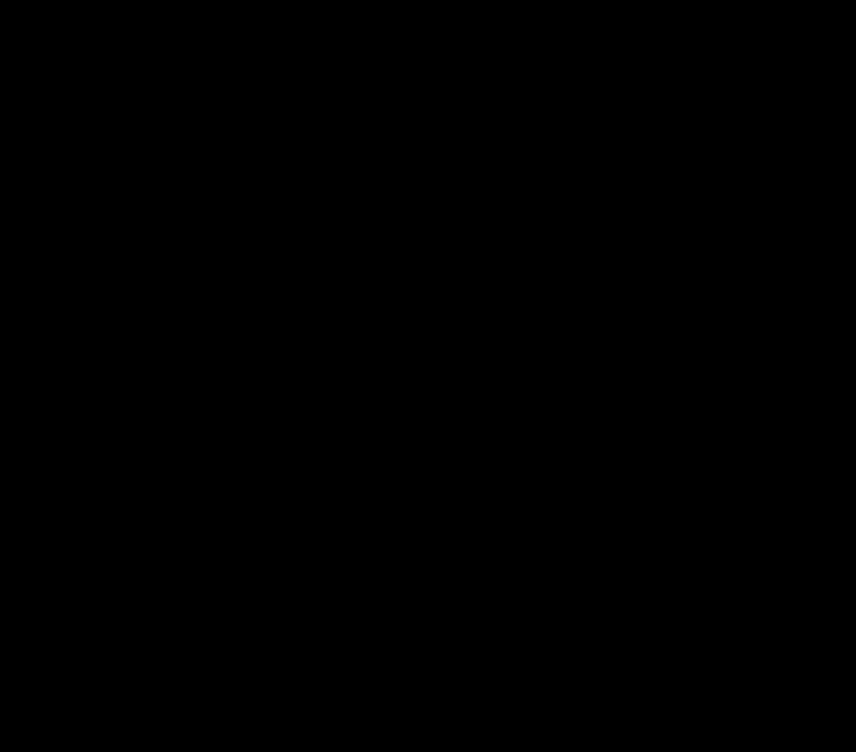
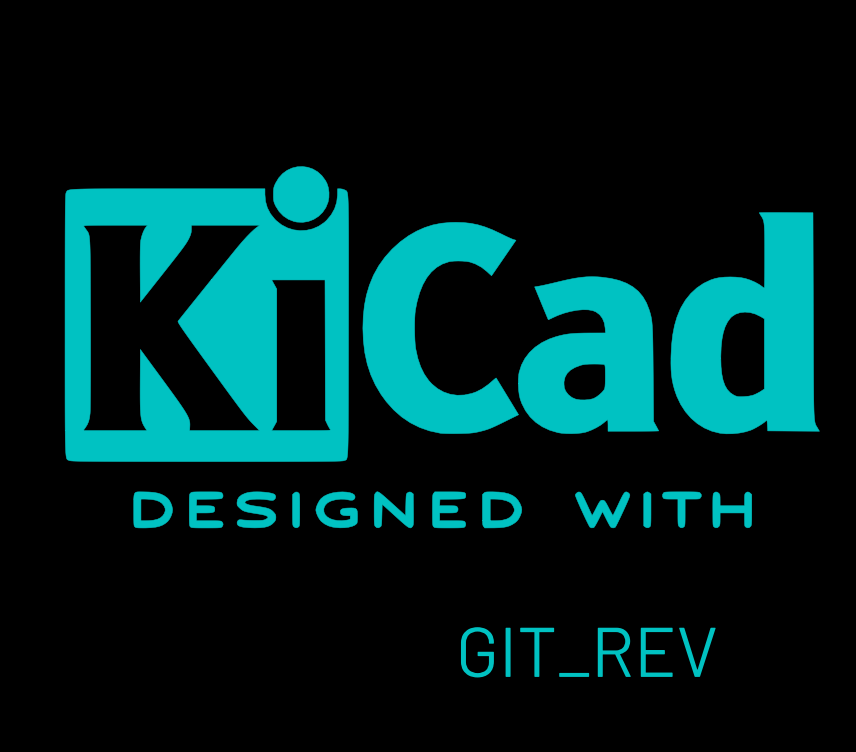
drawing: none -> [64, 166, 820, 529]
text: none -> GIT_REV (588, 652)

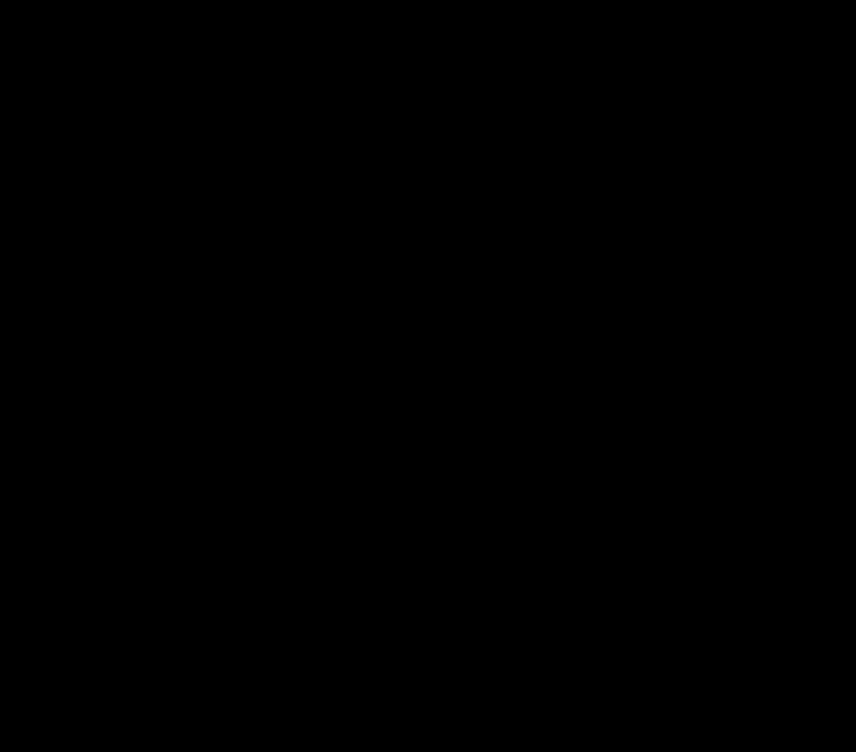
drawing: [64, 166, 820, 529] -> none
text: GIT_REV (588, 652) -> none

